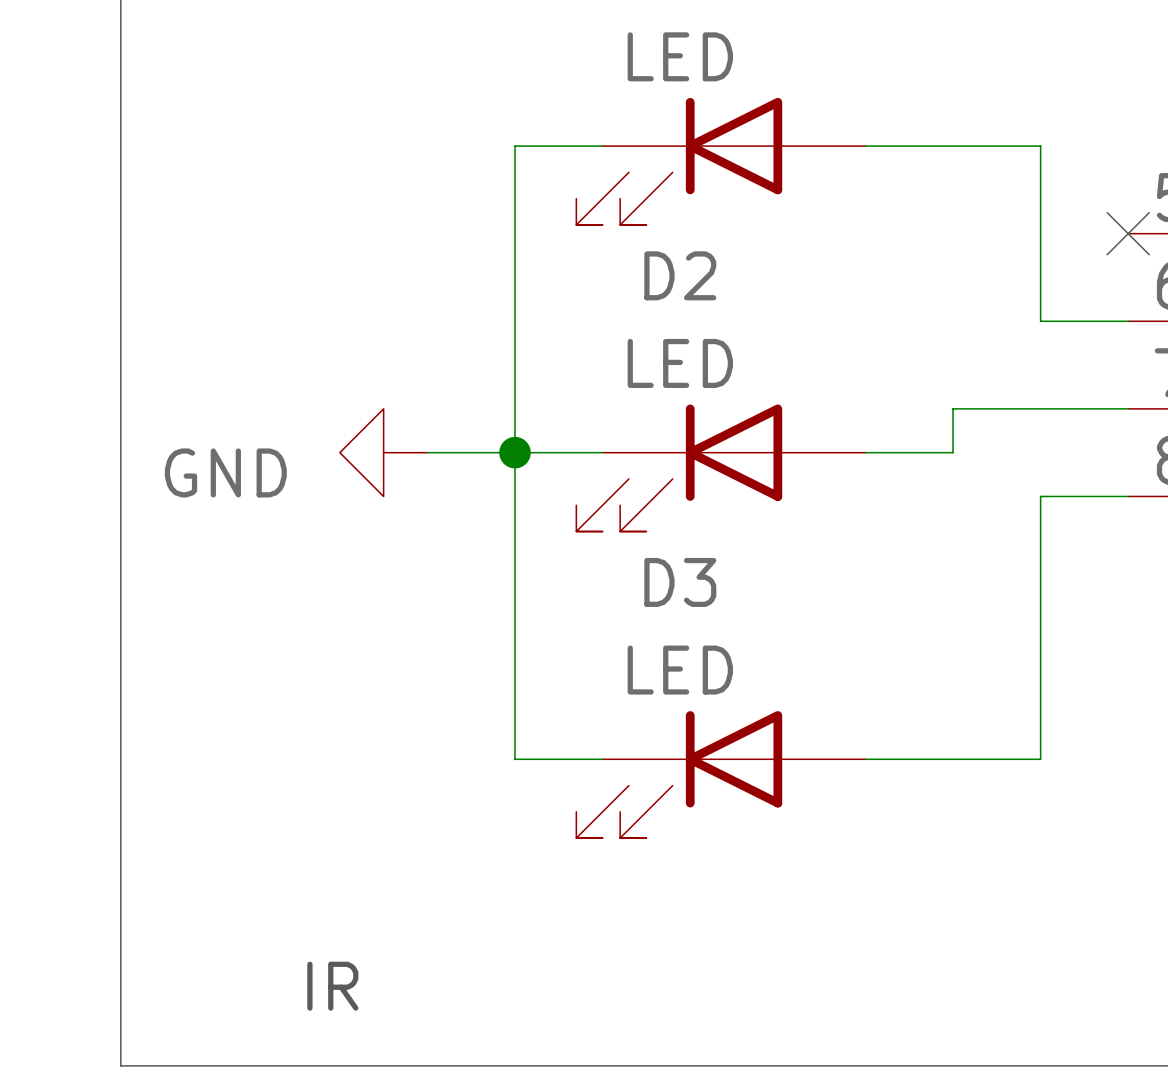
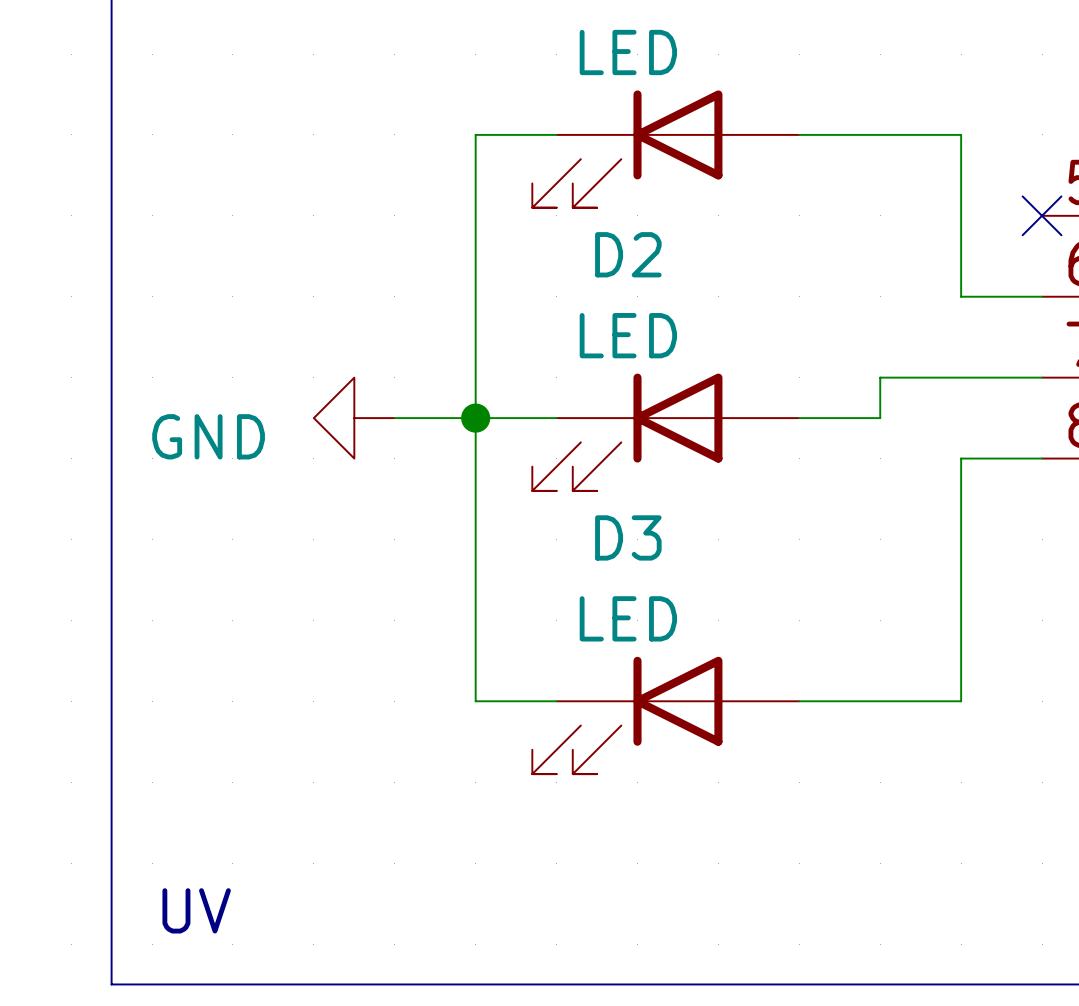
text: none -> UV (196, 910)
text: IR (332, 986) -> none

